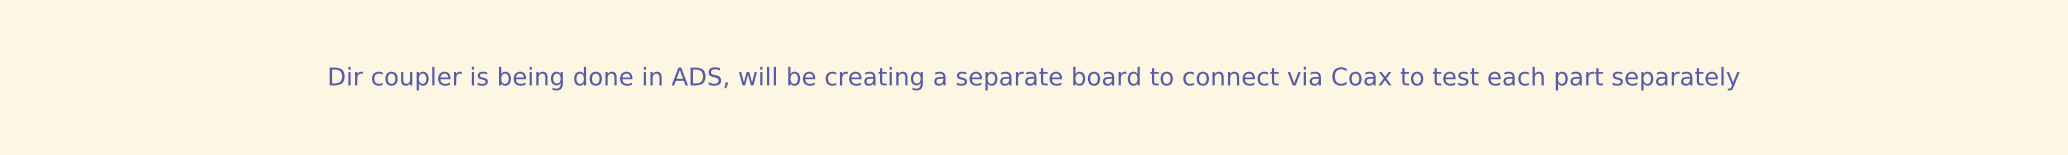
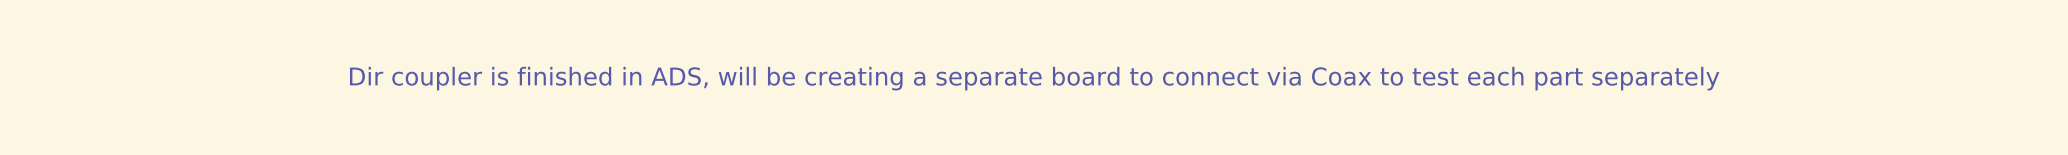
text: Dir coupler is being done in ADS, will be creating a separate board to connect via Coax to test each part separately (1034, 78) -> Dir coupler is finished in ADS, will be creating a separate board to connect via Coax to test each part separately (1034, 78)

